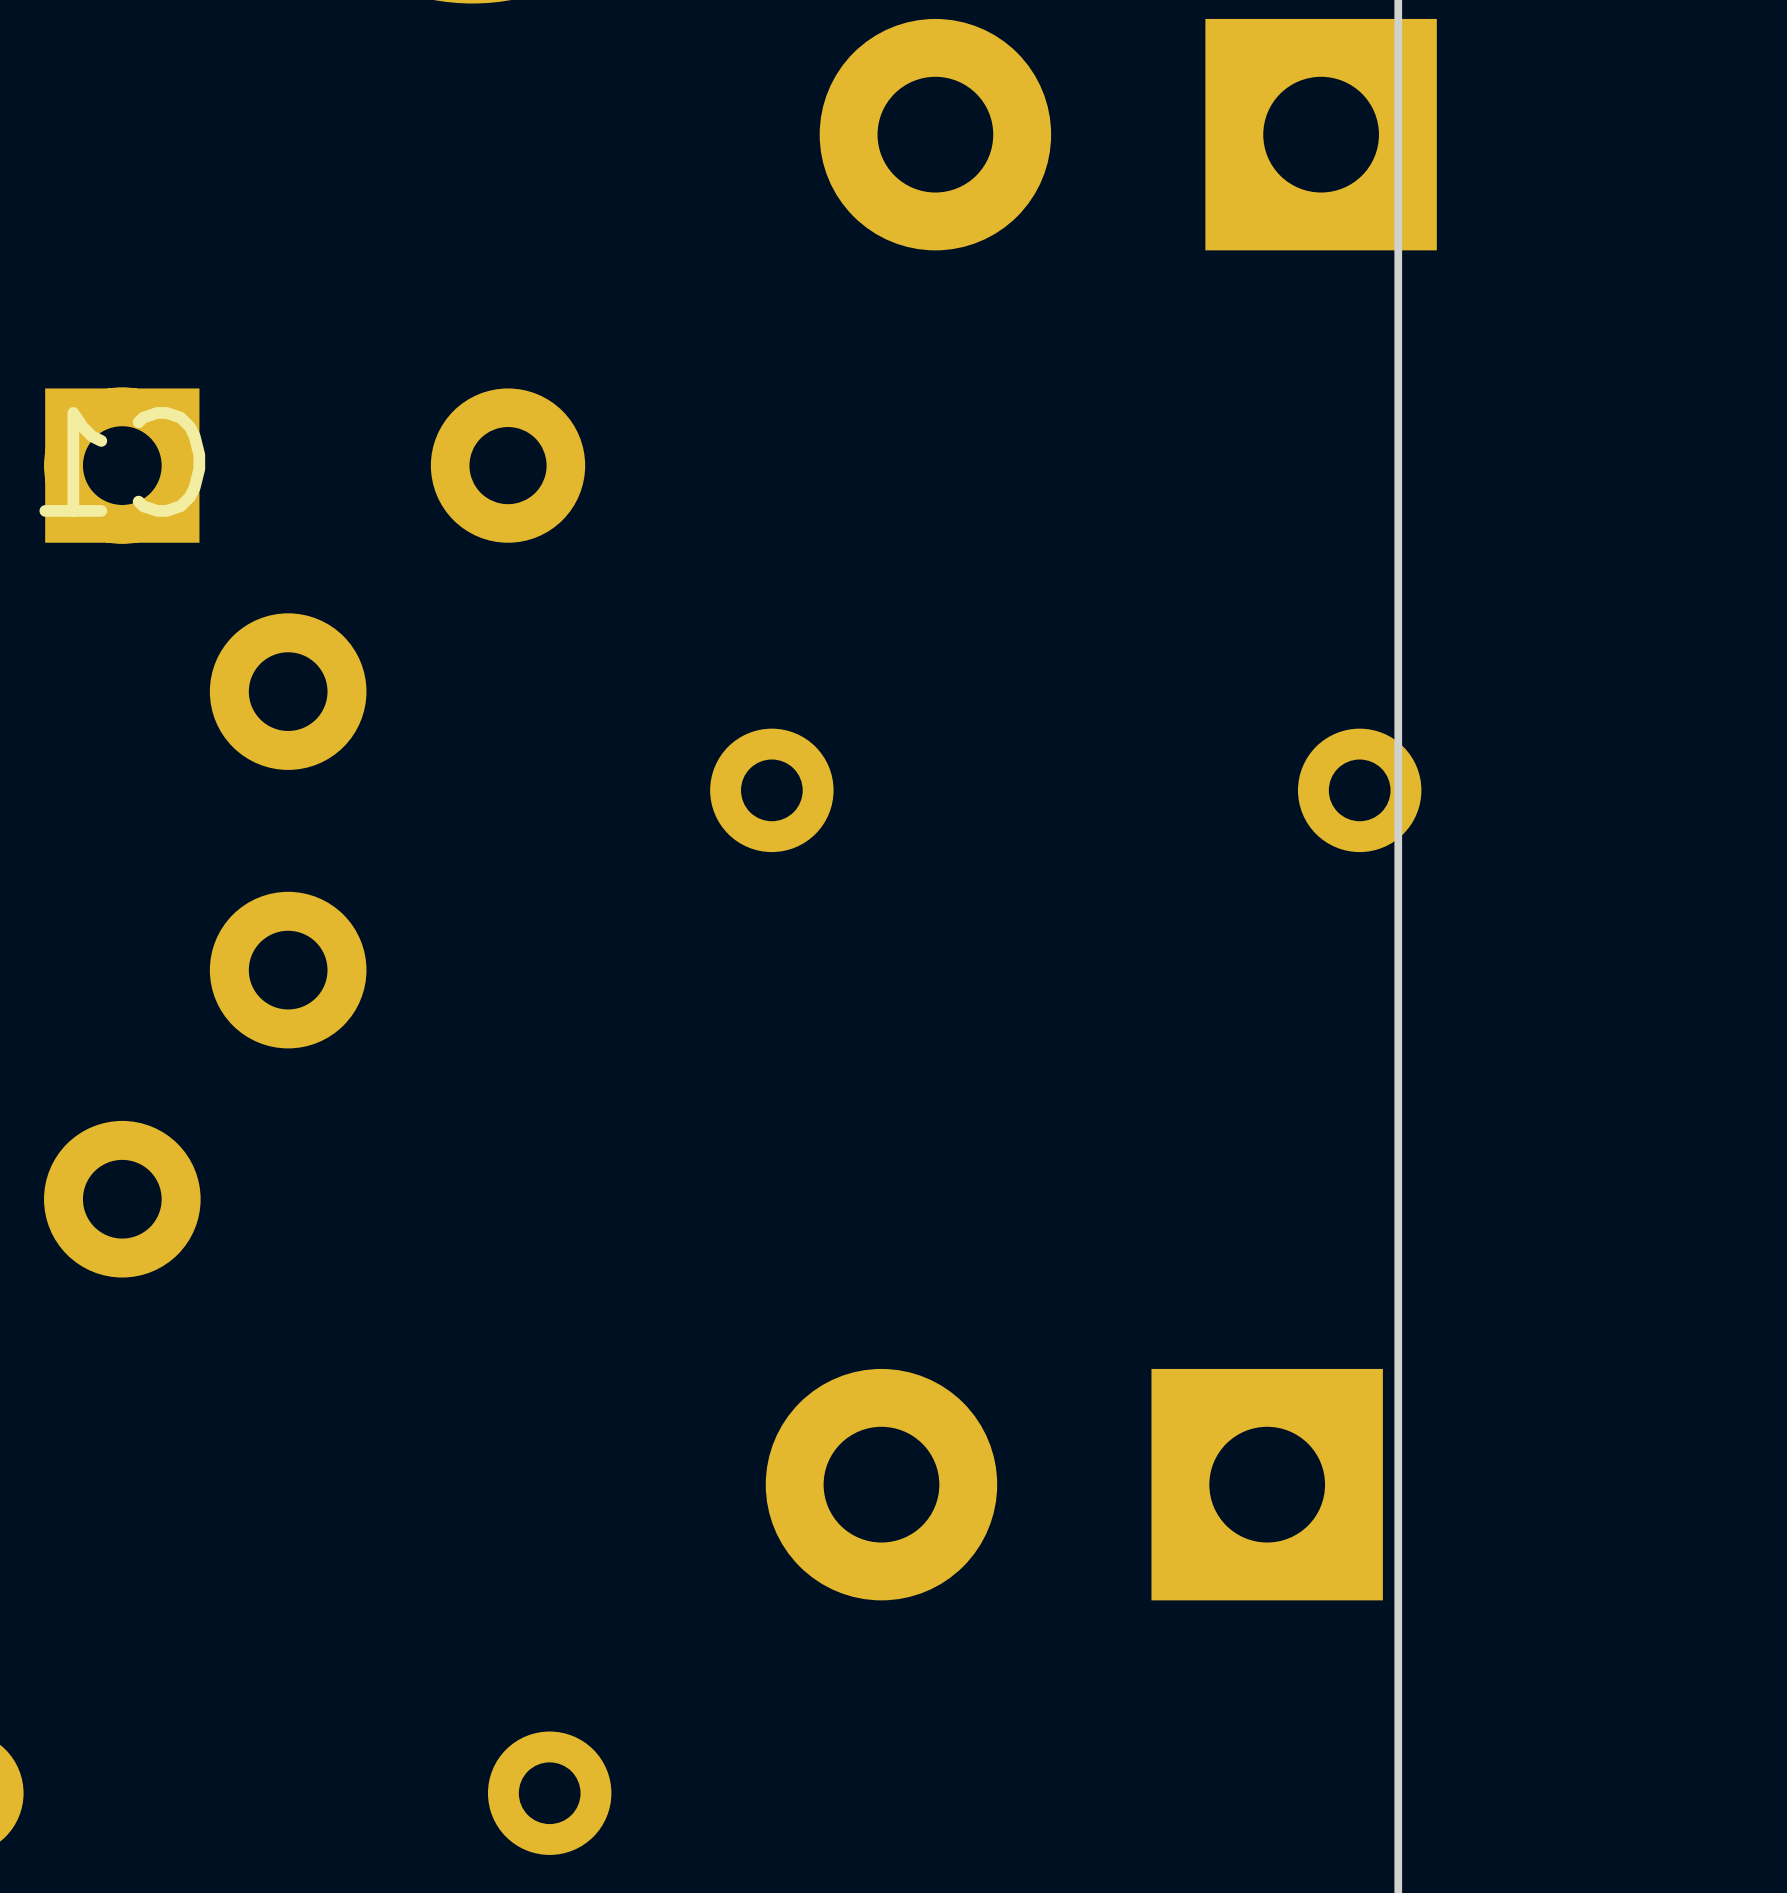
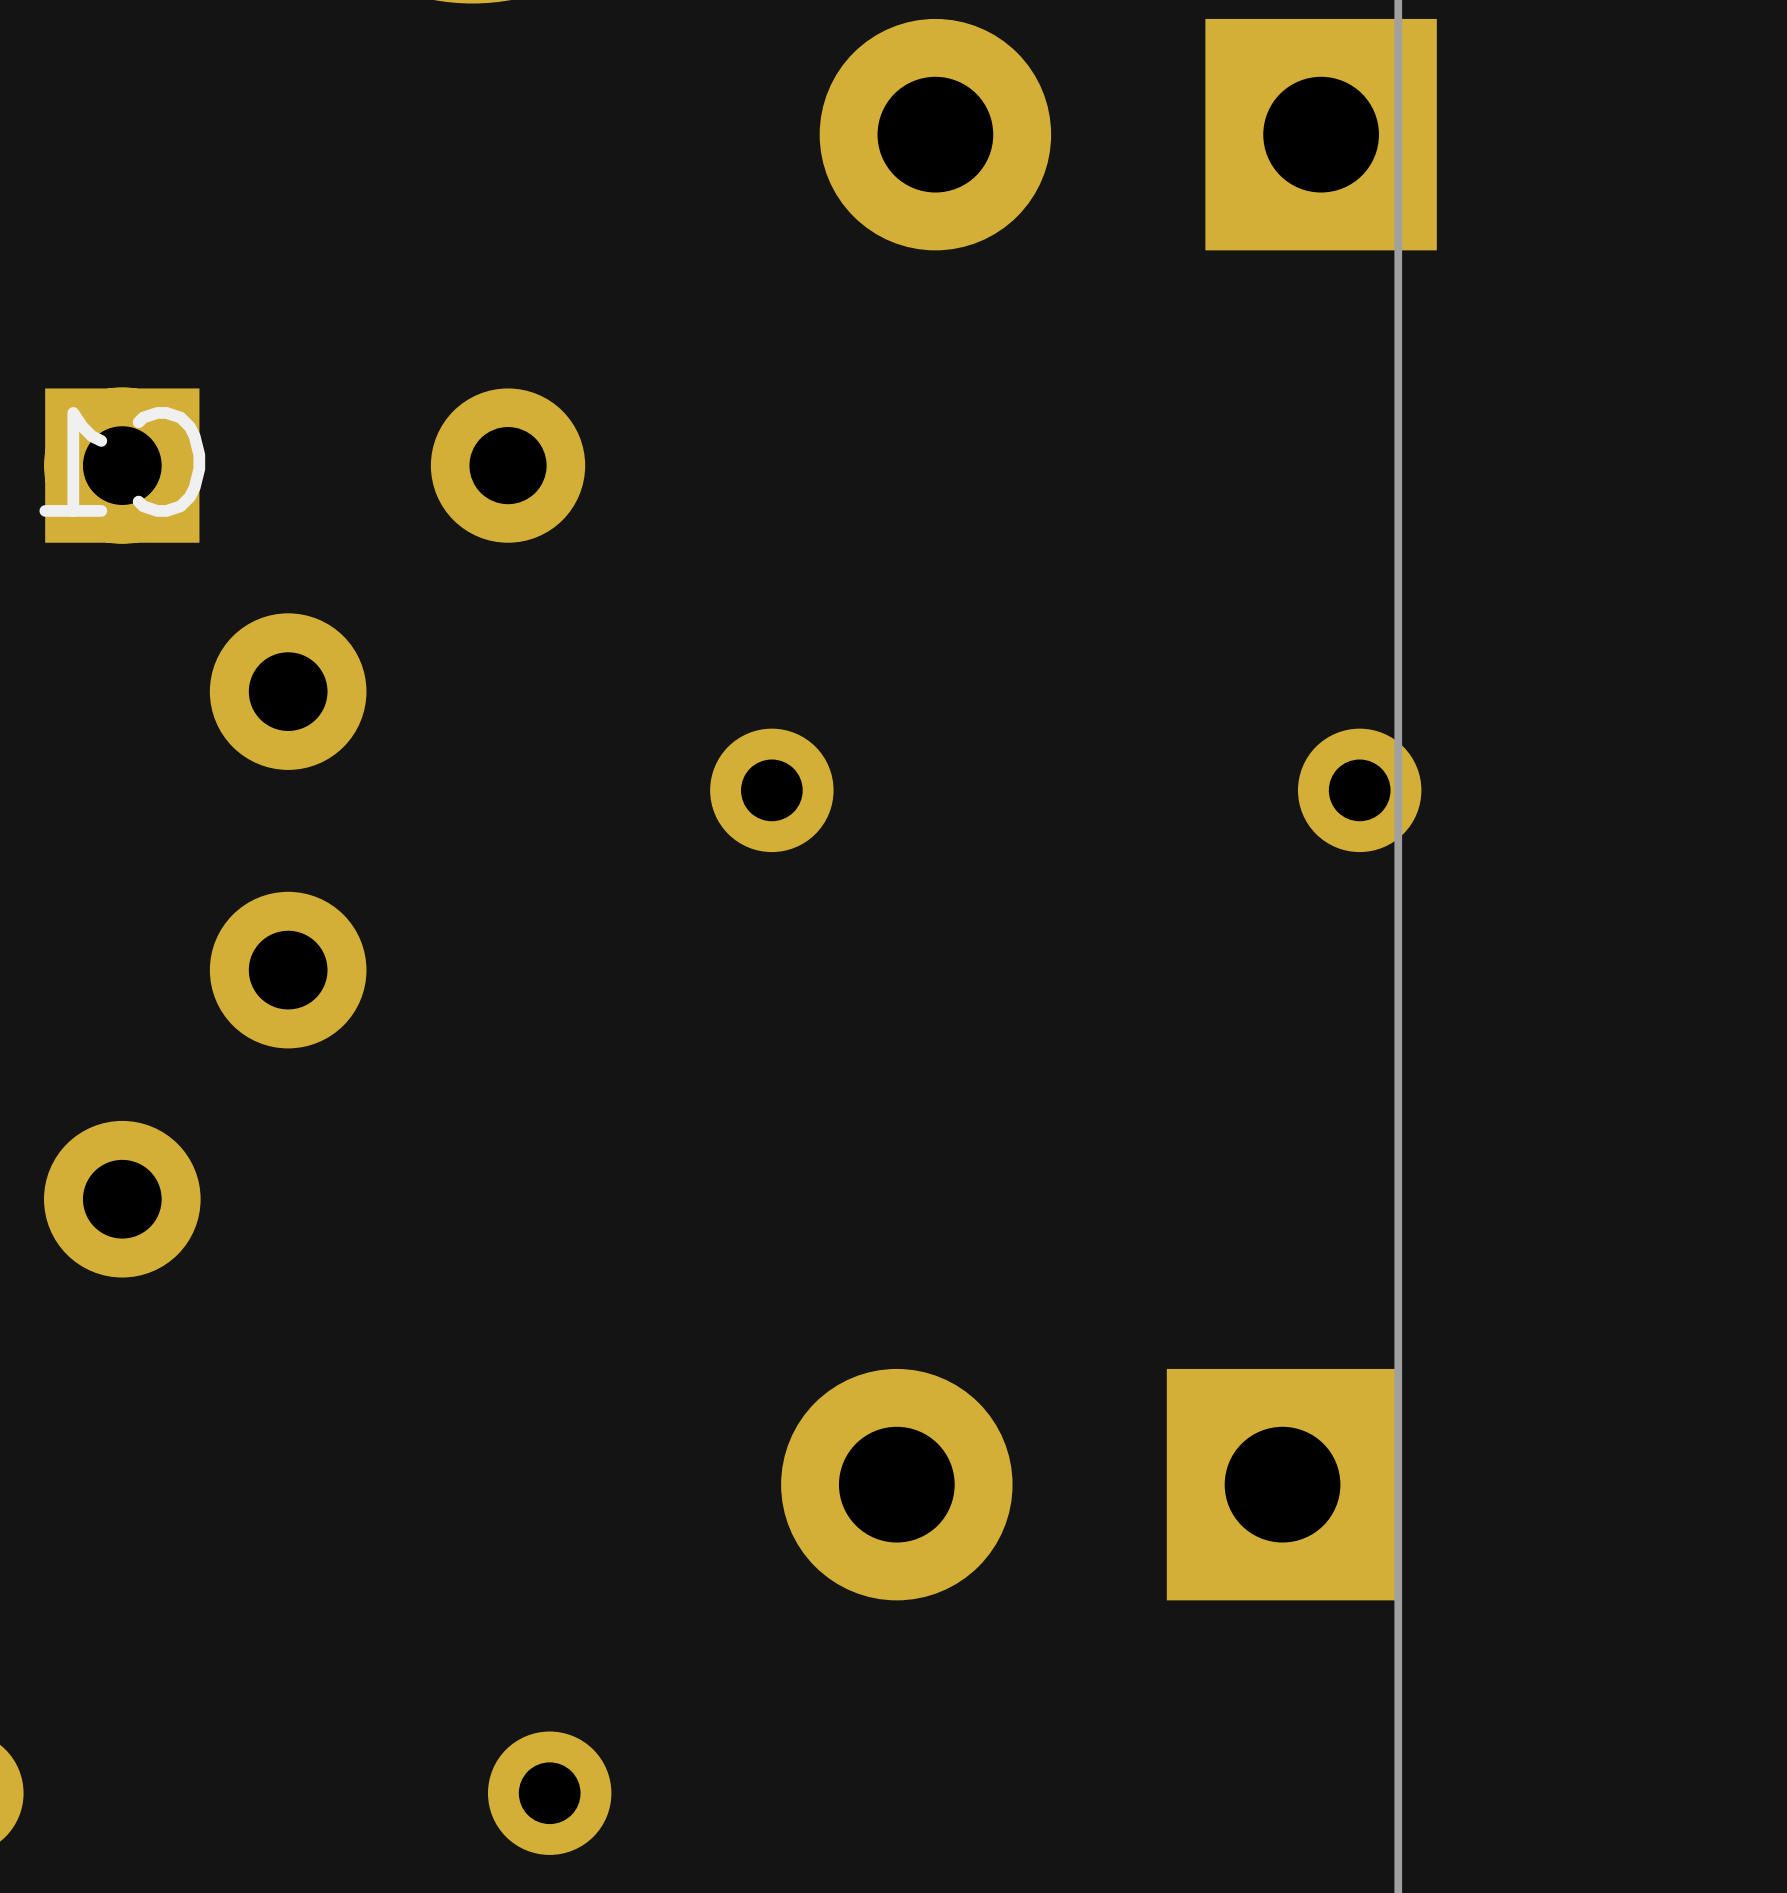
part position: (1074, 1484) -> (1089, 1484)

